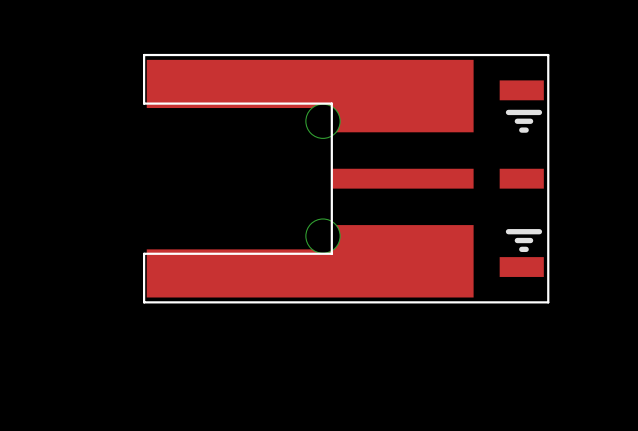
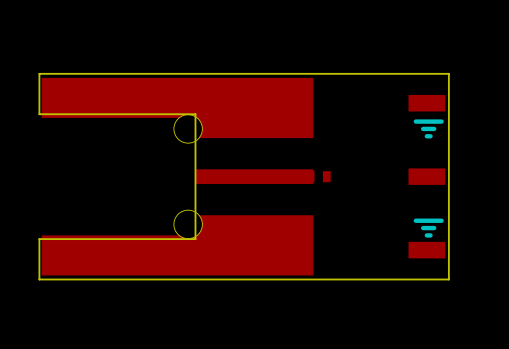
board edge: (144, 55) (144, 103) -> (112, 73) (39, 73) (39, 114) (112, 114)
board edge: (243, 103) (331, 103) (331, 253) (243, 253) -> (195, 114) (195, 239)
part: none -> (177, 176)
part: (310, 178) -> none
part: none -> (318, 176)
board edge: (144, 253) (144, 302) -> (112, 239) (39, 239) (39, 279) (112, 279)

